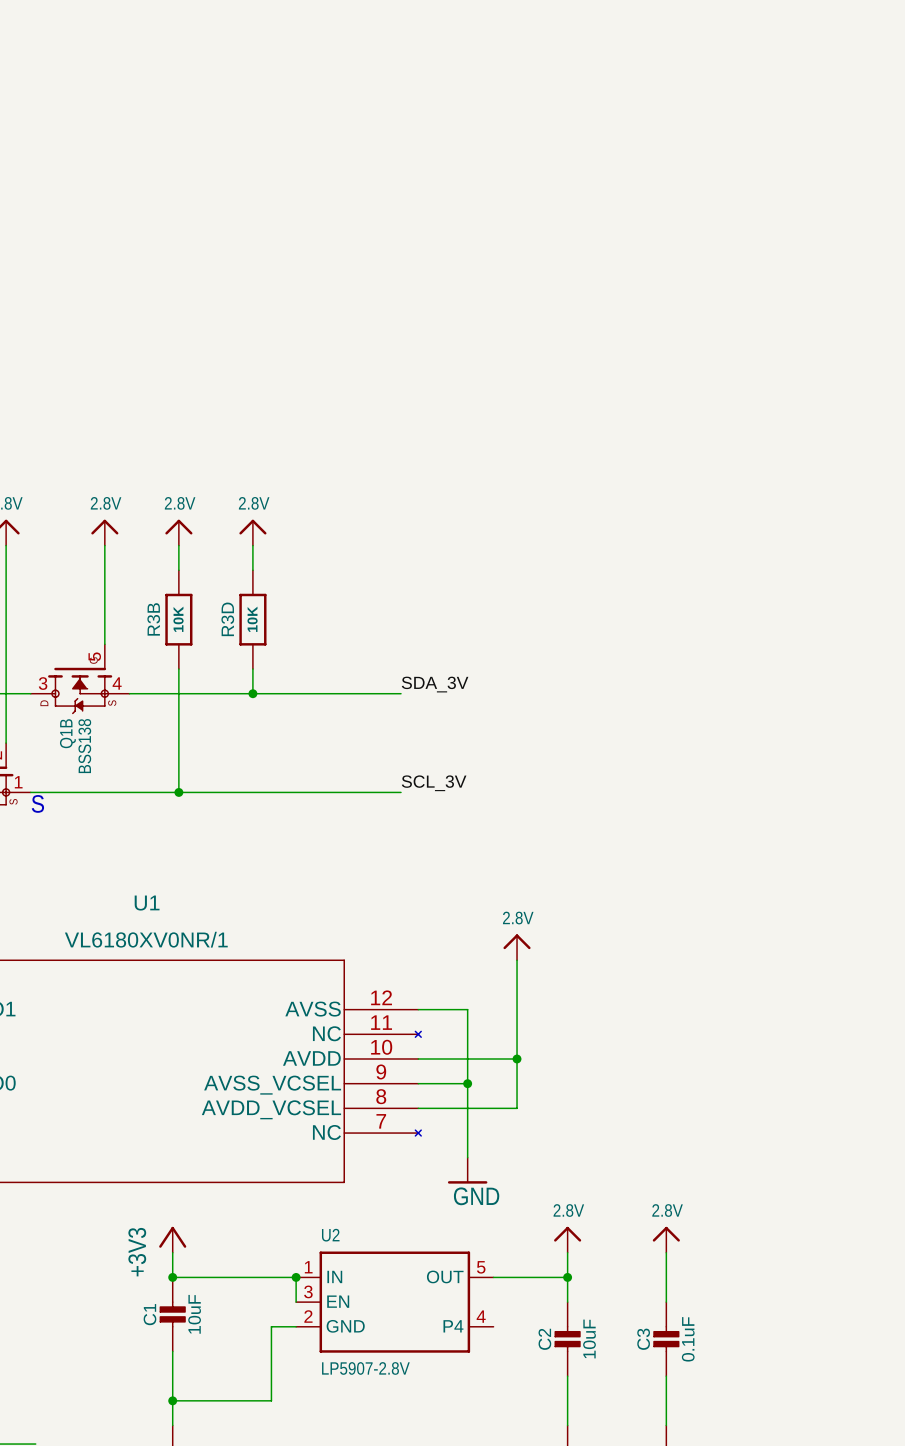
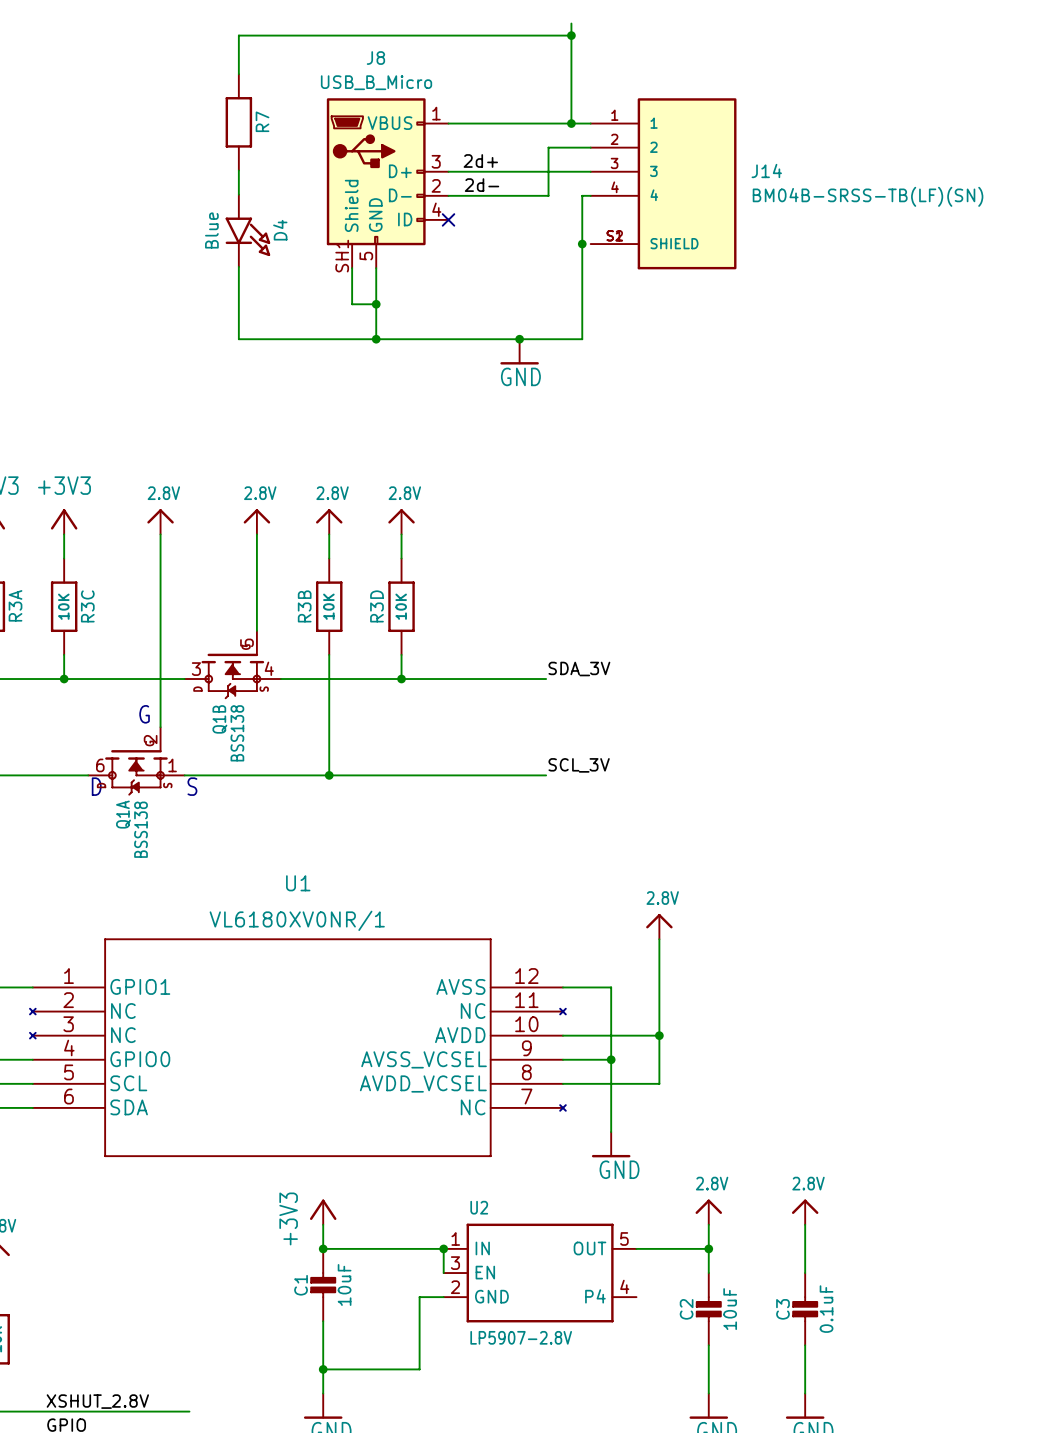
wire: none -> (571, 23) (571, 123)
wire: none -> (571, 35) (238, 35) (238, 74)
junction: none -> (571, 35)
R7: none -> (238, 122)
wire: none -> (448, 123) (590, 123)
junction: none -> (571, 123)
wire: none -> (590, 147) (548, 147) (548, 195) (448, 195)
label: none -> 2d+ (480, 160)
wire: none -> (238, 170) (238, 194)
wire: none -> (448, 171) (590, 171)
J8: none -> USB_B_Micro (387, 183)
J14: none -> BM04B-SRSS-TB(LF)(SN) (663, 183)
label: none -> 2d- (482, 185)
wire: none -> (590, 195) (582, 195) (582, 339) (238, 339) (238, 266)
no-connect mark: none -> (448, 219)
D4: none -> Blue (247, 230)
junction: none -> (582, 244)
wire: none -> (352, 268) (352, 304) (376, 304)
wire: none -> (376, 268) (376, 339)
junction: none -> (376, 304)
junction: none -> (376, 339)
junction: none -> (519, 339)
power symbol: none -> GND (519, 351)

